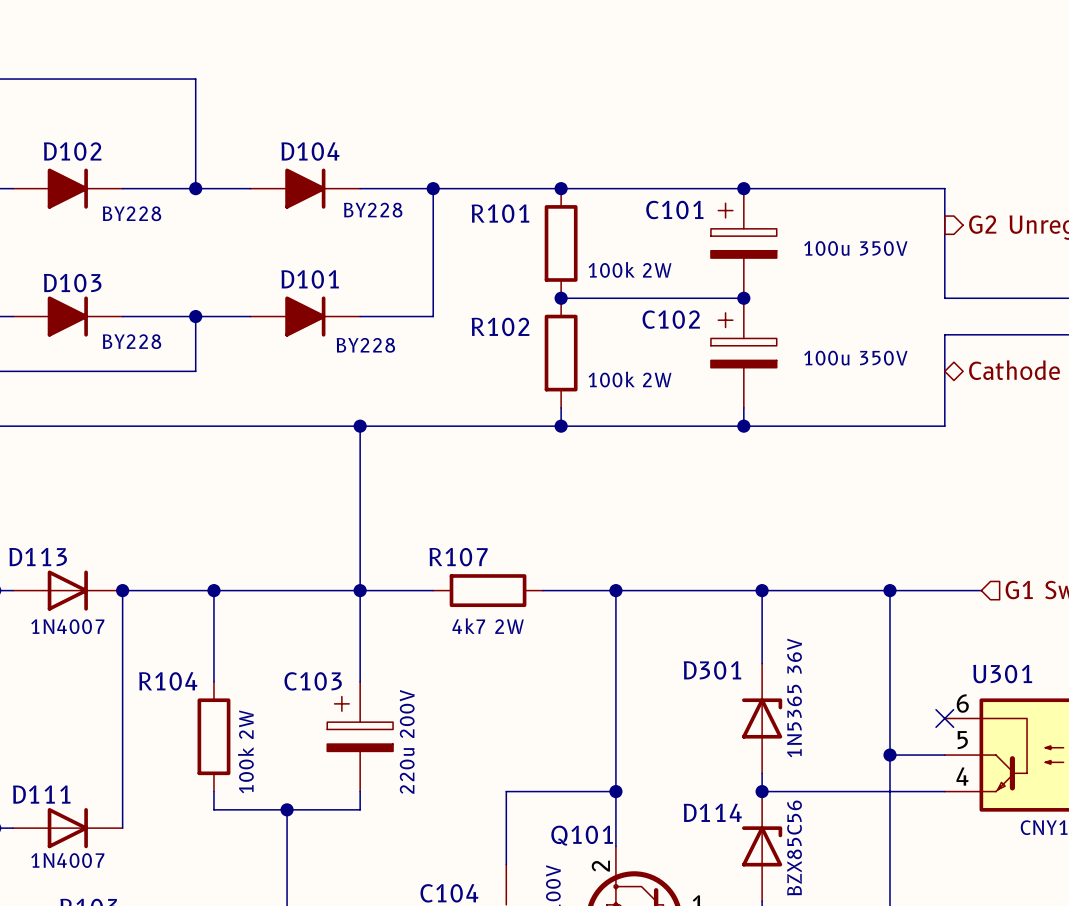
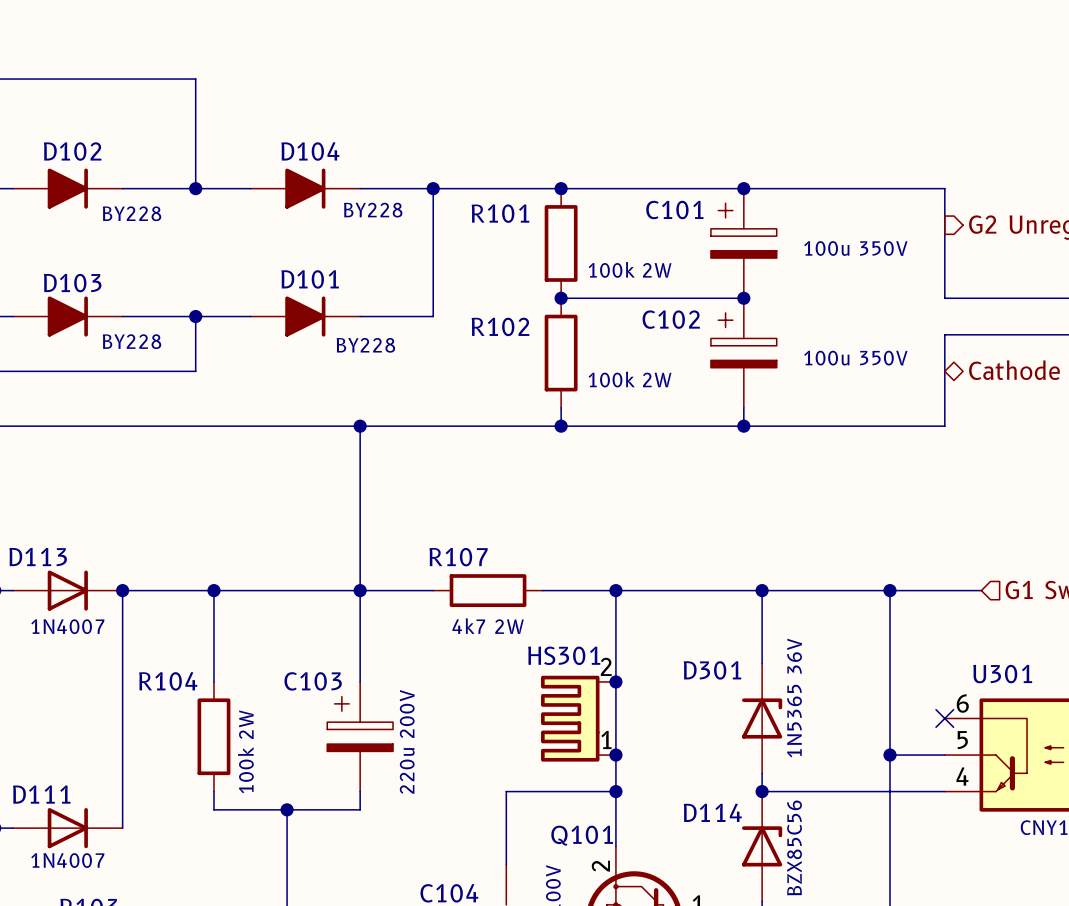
junction: none -> (615, 681)
HS301: none -> (578, 718)
junction: none -> (615, 755)

